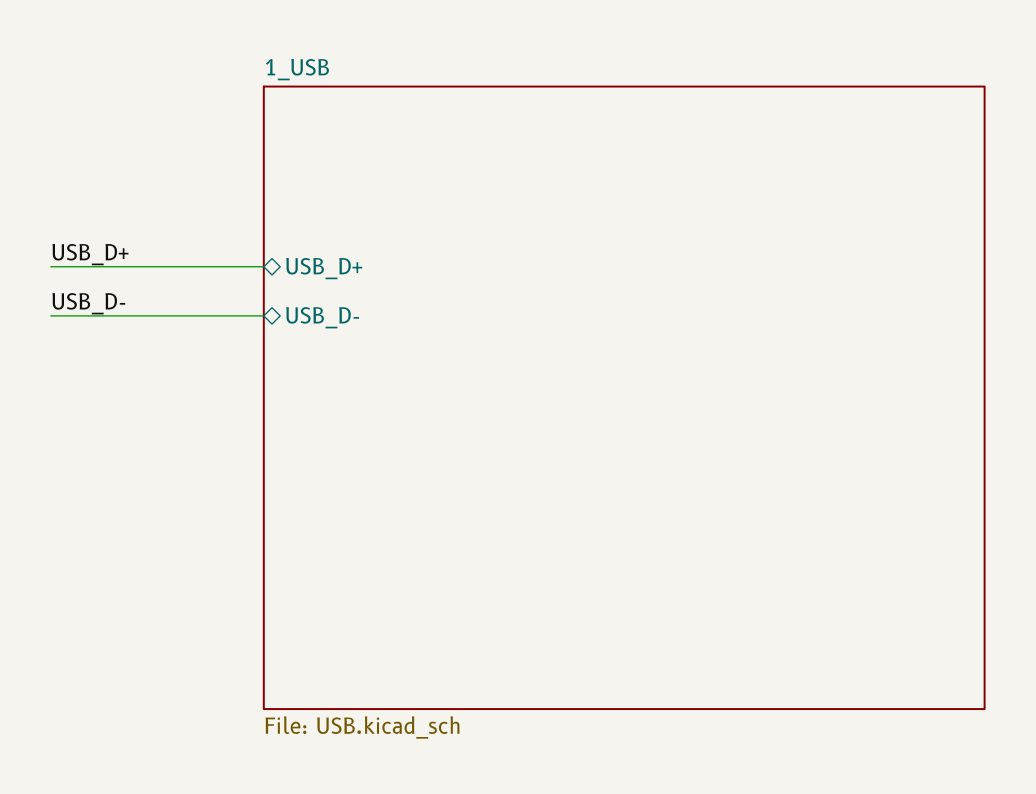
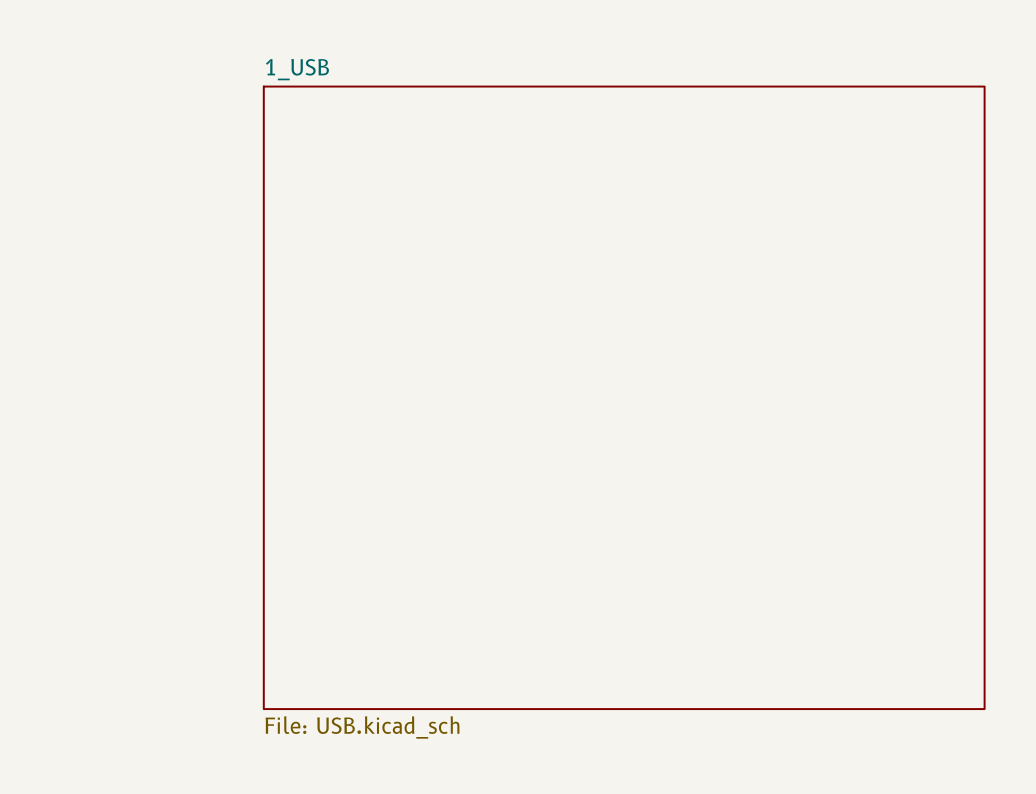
label: USB_D+ (90, 254) -> none
wire: (50, 266) (263, 266) -> none
sheet pin: USB_D+ (324, 268) -> none
label: USB_D- (88, 303) -> none
wire: (50, 315) (263, 315) -> none
sheet pin: USB_D- (322, 317) -> none

